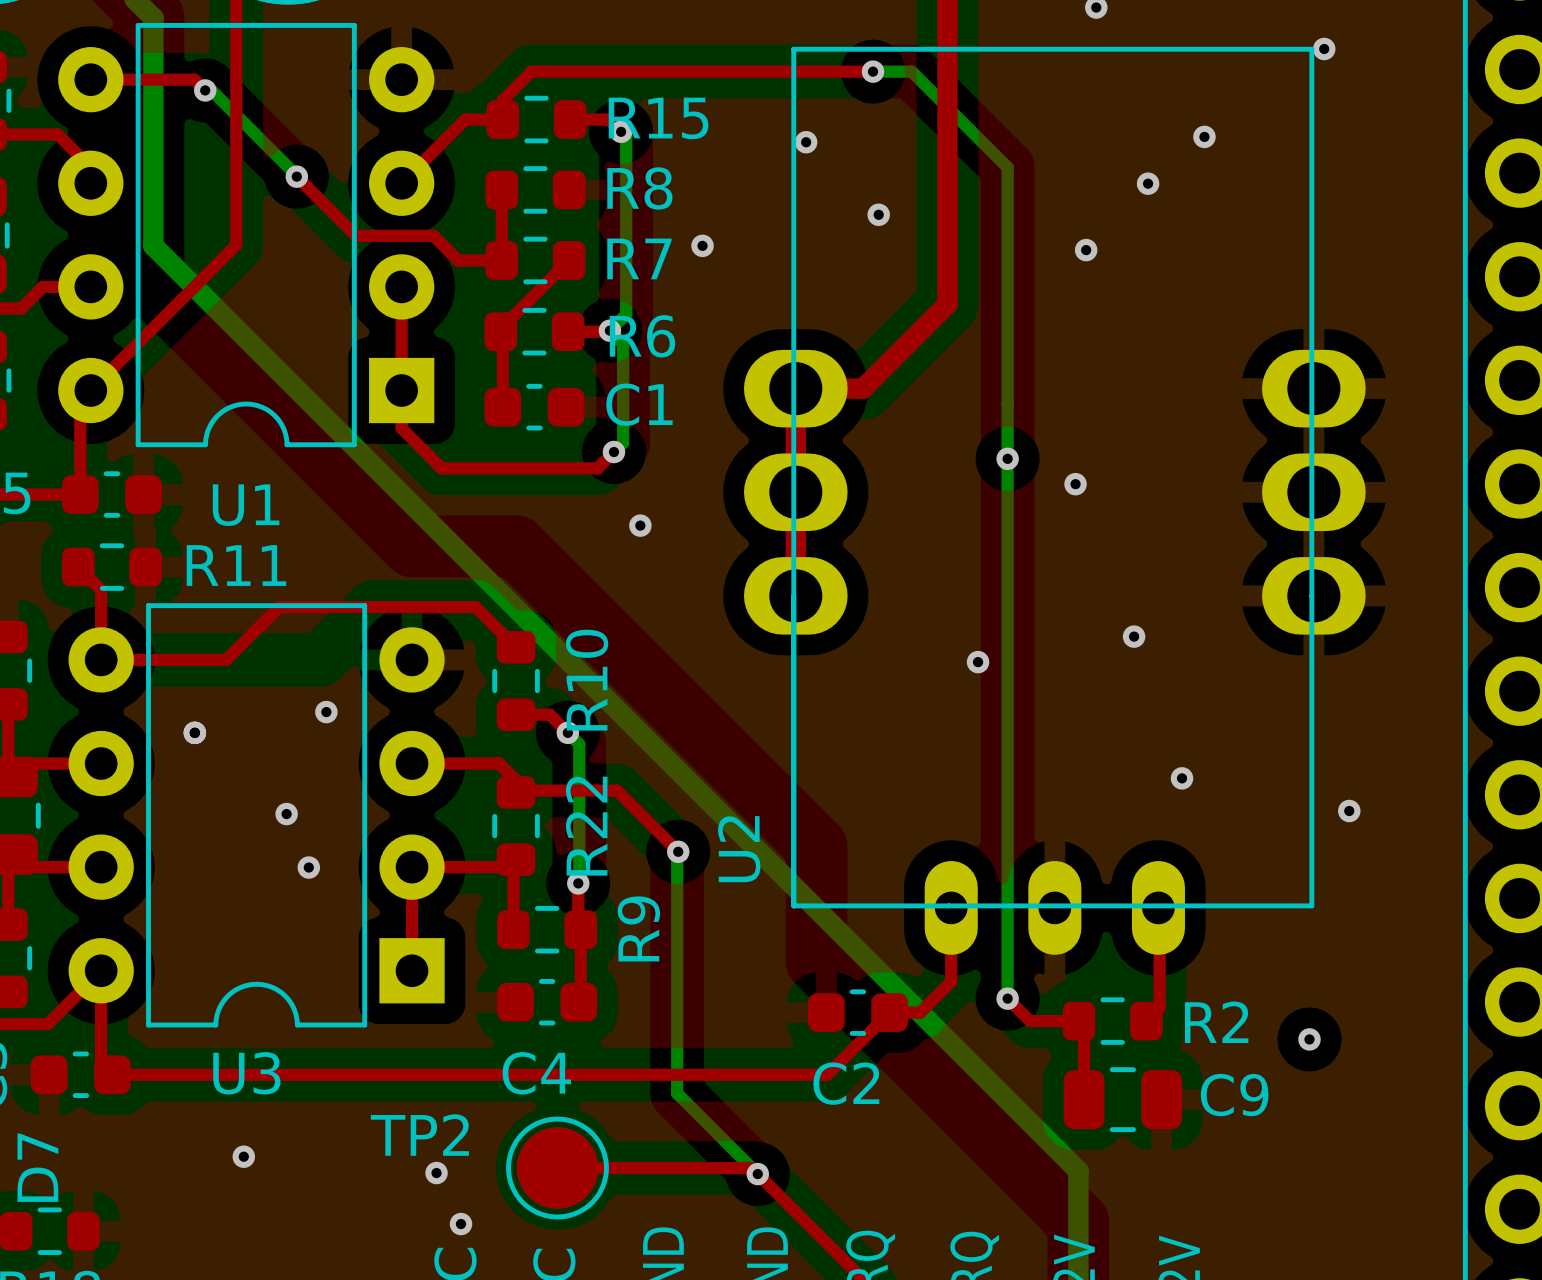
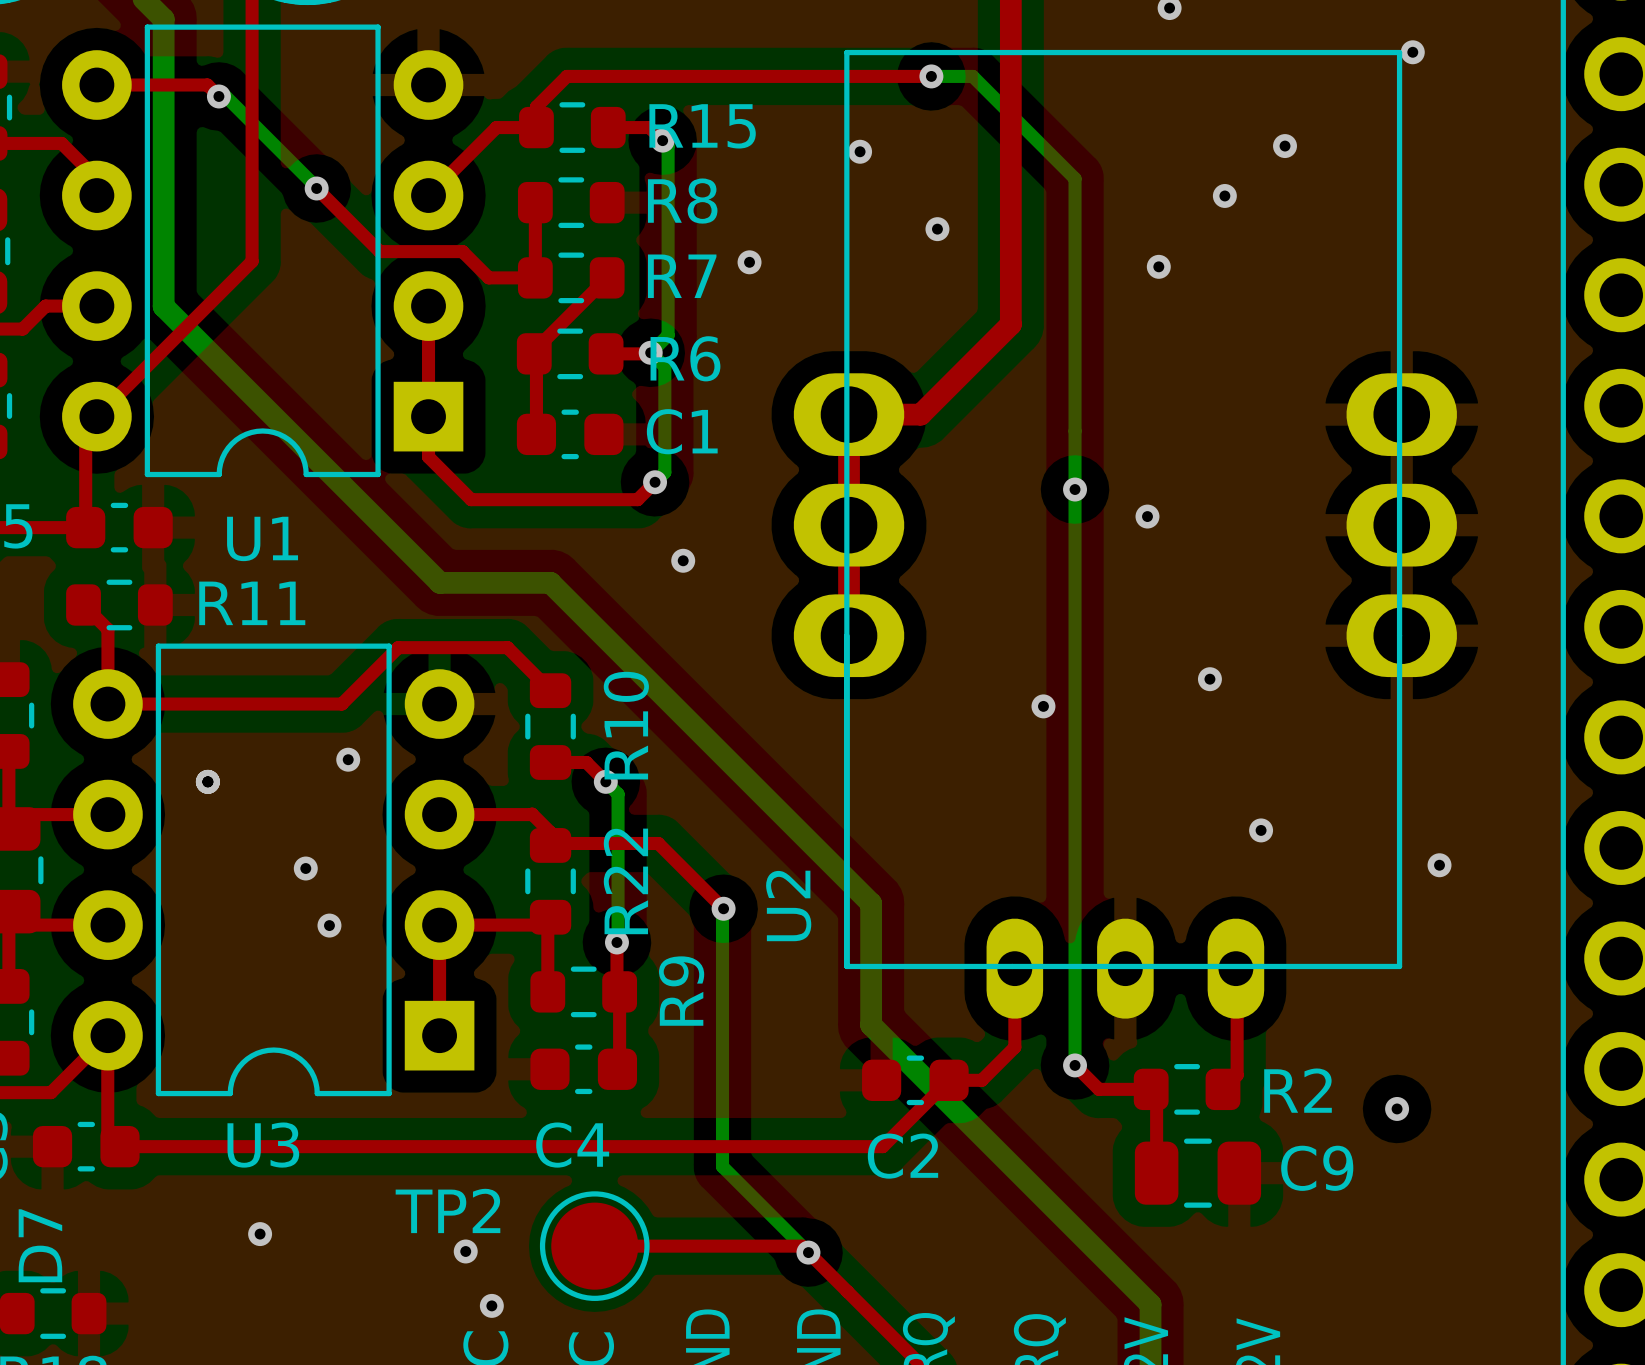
bottom track: (153, 245) (1078, 1170) (1078, 1222) -> (163, 262) (163, 306) (440, 582) (550, 582) (871, 903) (871, 1025) (1150, 1304)
top track: (373, 607) (279, 607) (226, 659) -> (398, 647) (341, 704) (241, 704)

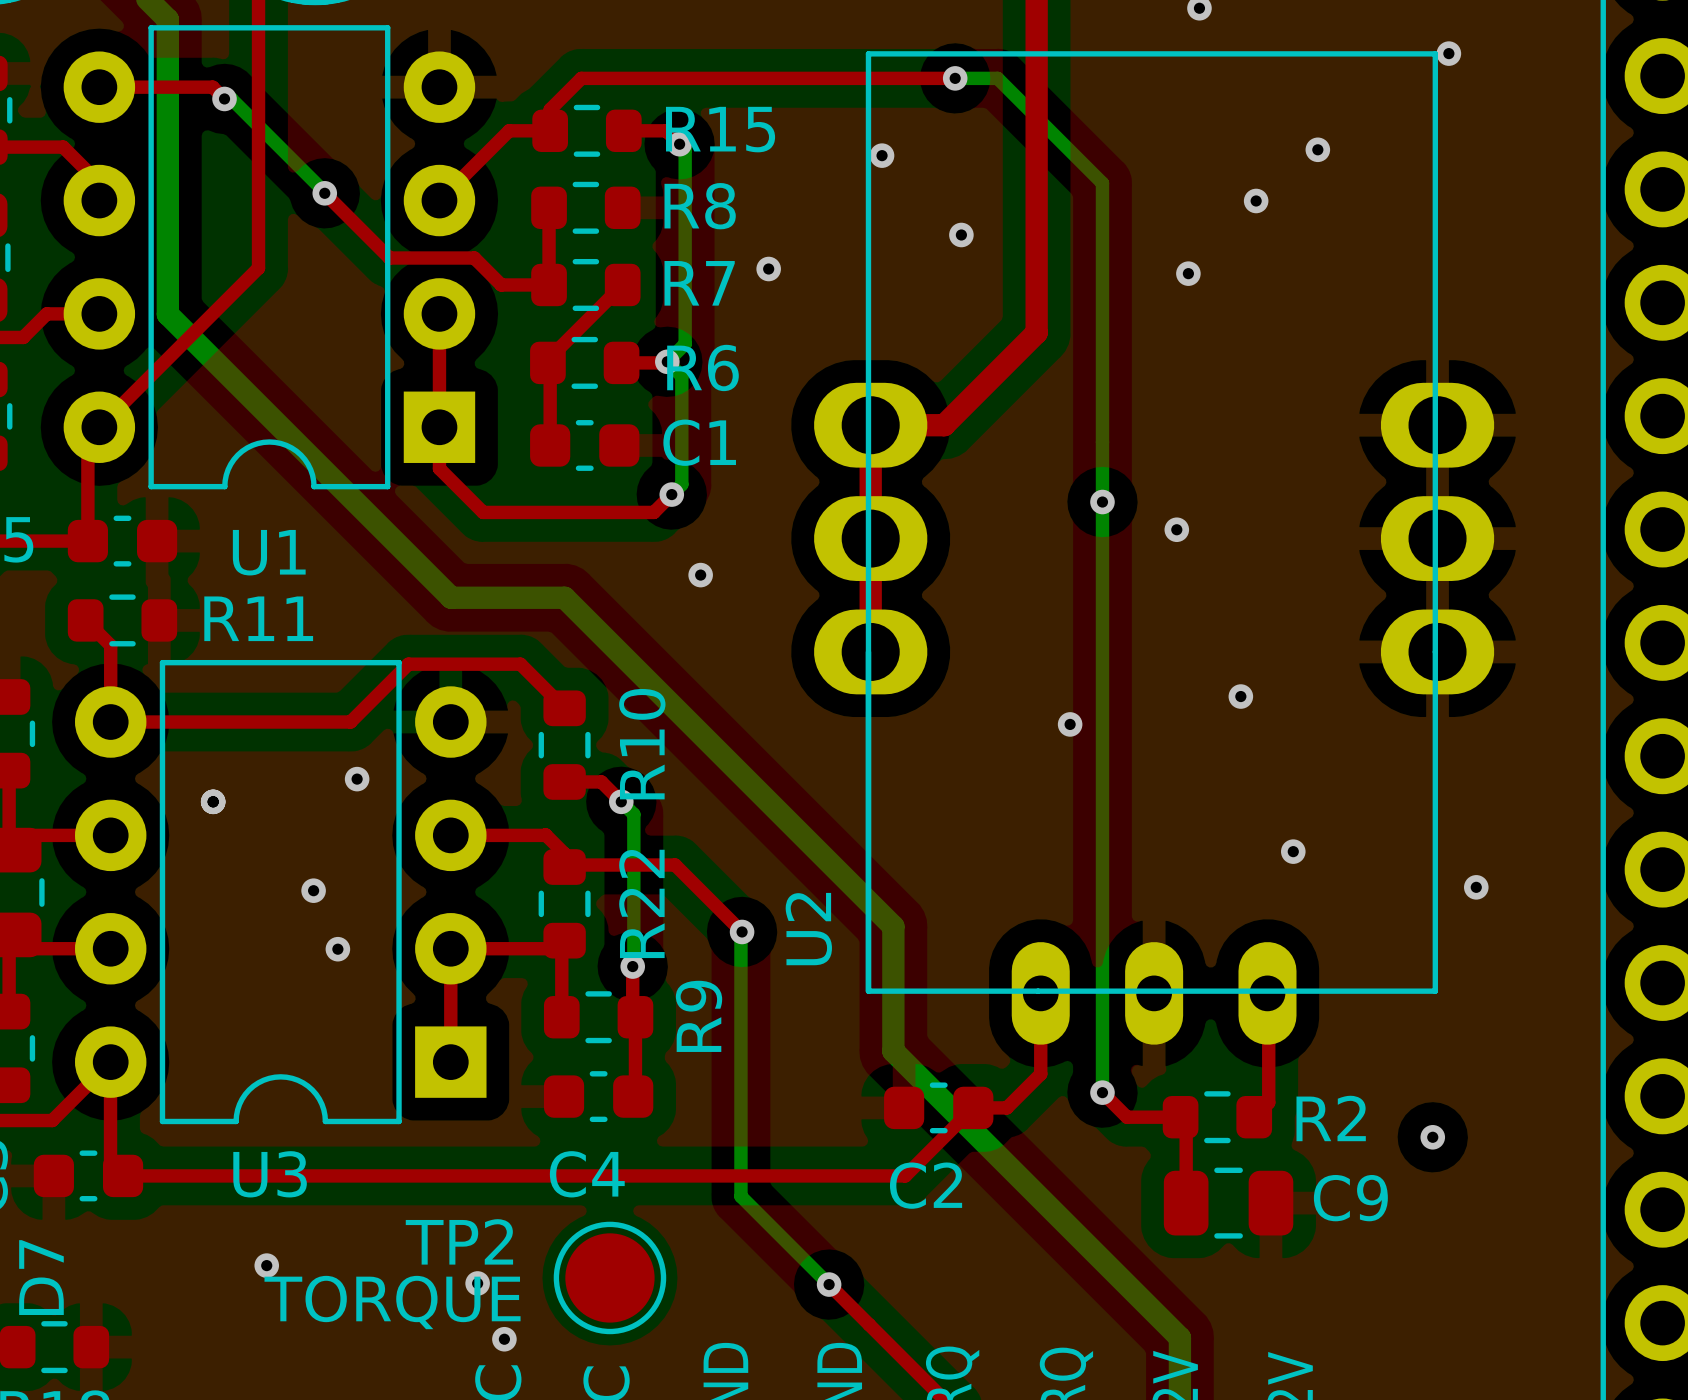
top track: (594, 1246) (802, 1246) (808, 1252) -> none
text: none -> TORQUE (392, 1302)

